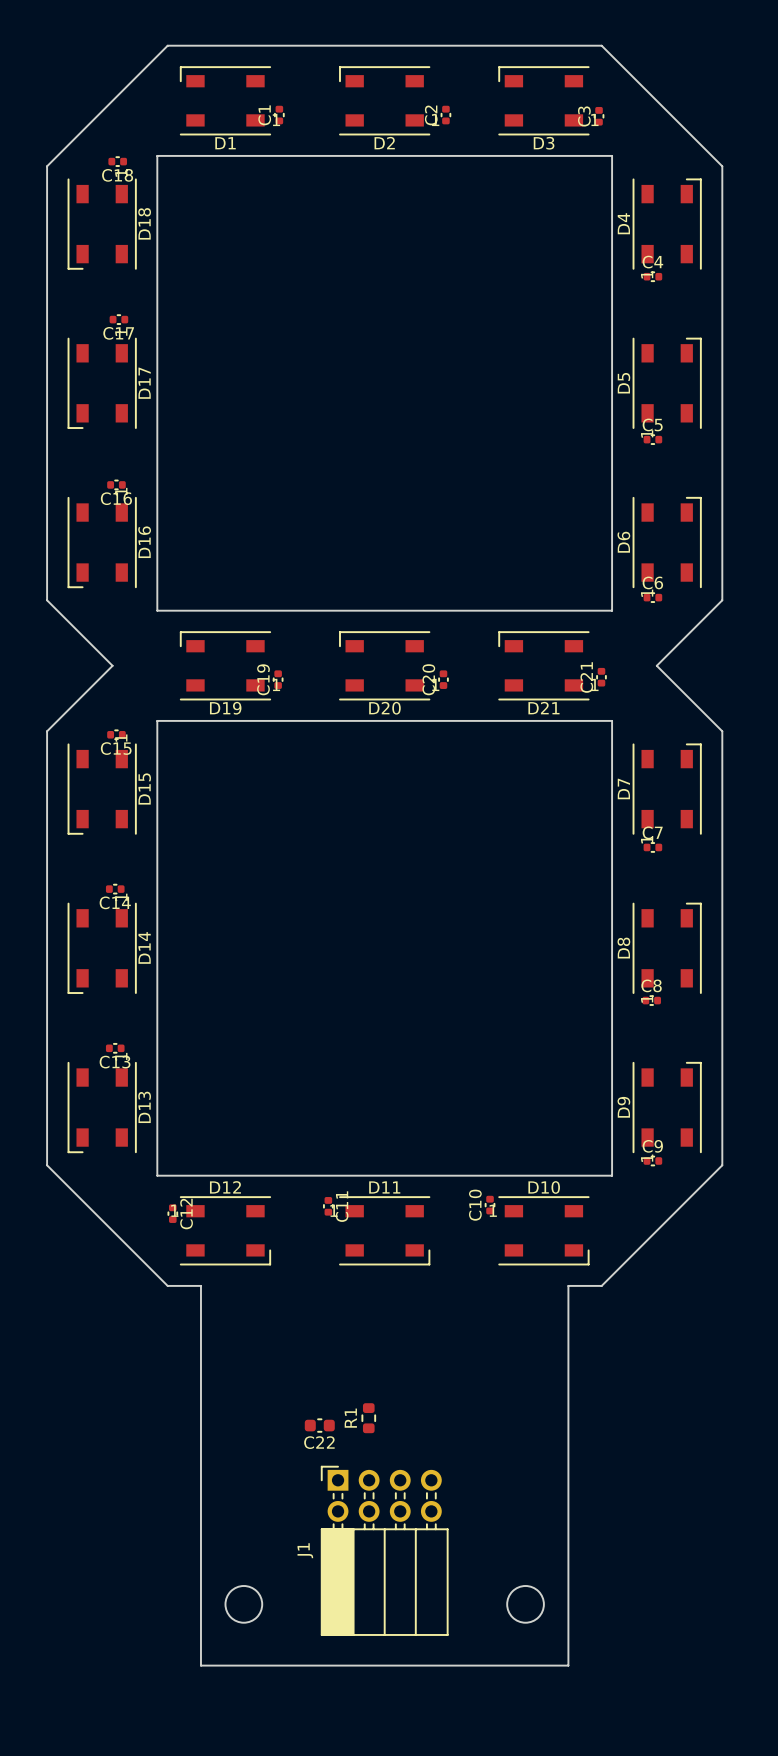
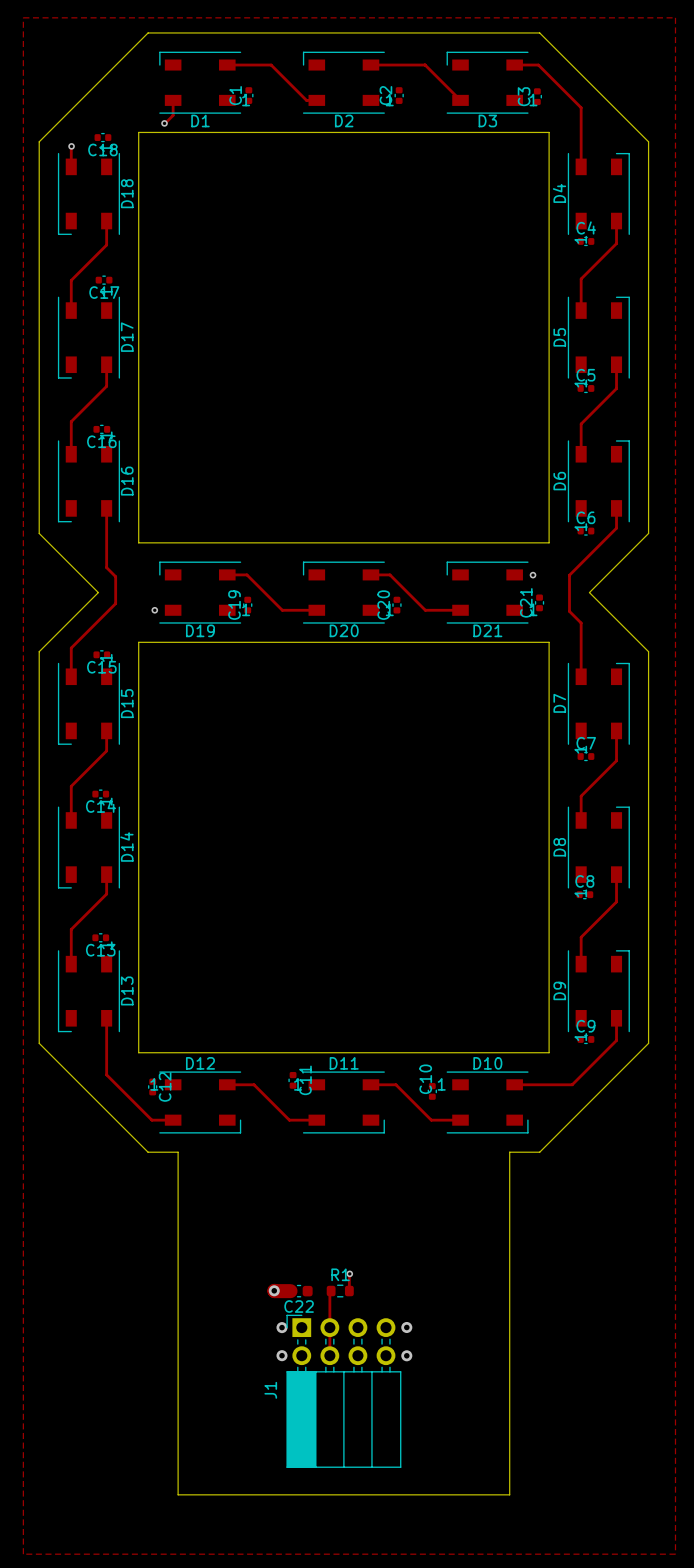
zone outline: none -> (23, 17) (23, 1554) (675, 1554) (675, 17) (23, 17)
track: none -> (227, 65) (271, 65) (306, 100) (316, 100)
track: none -> (370, 65) (424, 65)
track: none -> (425, 64) (460, 100)
track: none -> (514, 65) (538, 65) (581, 107) (581, 166)
track: none -> (173, 100) (173, 115) (164, 123)
via: none -> (164, 123)
track: none -> (71, 146) (71, 166)
via: none -> (71, 146)
track: none -> (106, 221) (106, 245) (71, 280) (71, 310)
track: none -> (616, 221) (616, 243) (581, 278) (581, 310)
track: none -> (106, 364) (106, 386) (71, 421) (71, 454)
track: none -> (616, 364) (616, 388) (581, 423) (581, 454)
track: none -> (106, 508) (106, 567) (115, 576) (115, 603) (71, 648) (71, 676)
track: none -> (616, 508) (616, 528) (569, 575) (569, 611) (581, 623) (581, 676)
track: none -> (227, 574) (246, 574) (282, 610) (316, 610)
track: none -> (370, 574) (389, 574) (425, 610) (460, 610)
via: none -> (533, 575)
via: none -> (154, 610)
track: none -> (106, 730) (106, 750) (71, 786) (71, 820)
track: none -> (616, 730) (616, 760) (581, 796) (581, 820)
track: none -> (106, 874) (106, 894) (71, 929) (71, 964)
track: none -> (616, 874) (616, 901) (581, 937) (581, 964)
track: none -> (106, 1018) (106, 1074) (151, 1120) (173, 1120)
track: none -> (616, 1018) (616, 1040) (572, 1084) (514, 1084)
C10 position: (490, 1205) -> (432, 1091)
track: none -> (227, 1084) (254, 1084) (289, 1120) (316, 1120)
track: none -> (370, 1084) (395, 1084) (431, 1120) (460, 1120)
R1 rotation: 0° (368, 1418) -> 90° clockwise (340, 1291)
R1 position: (368, 1418) -> (340, 1291)
track: none -> (349, 1273) (349, 1291)
via: none -> (349, 1273)
C22 position: (319, 1425) -> (299, 1291)
track: none -> (274, 1290) (290, 1291)
via: none -> (274, 1290)
track: none -> (331, 1291) (329, 1355)
via: none -> (282, 1327)
via: none -> (406, 1327)
via: none -> (282, 1355)
via: none -> (406, 1355)
round board edge: [224, 1585, 263, 1624] -> none
round board edge: [506, 1585, 545, 1624] -> none

